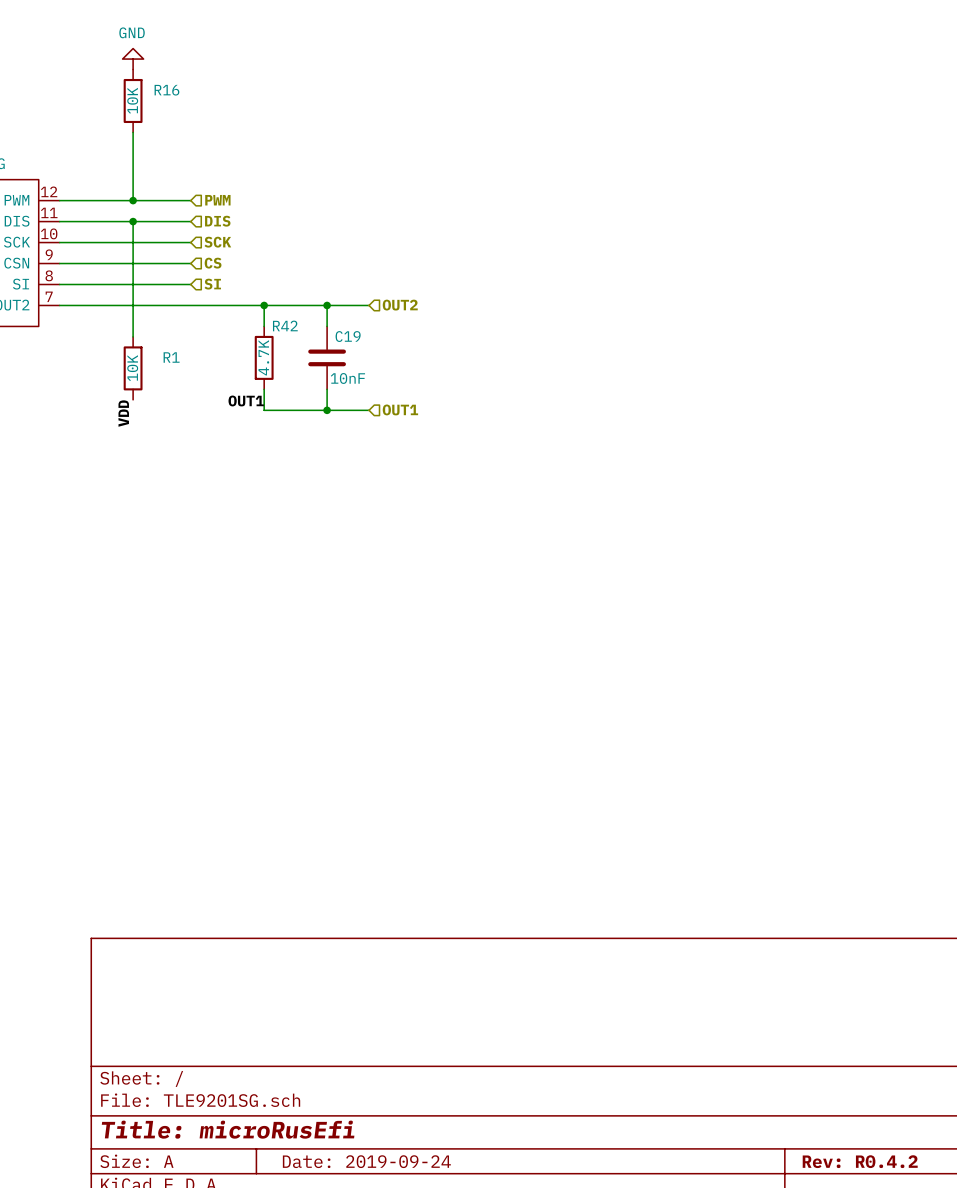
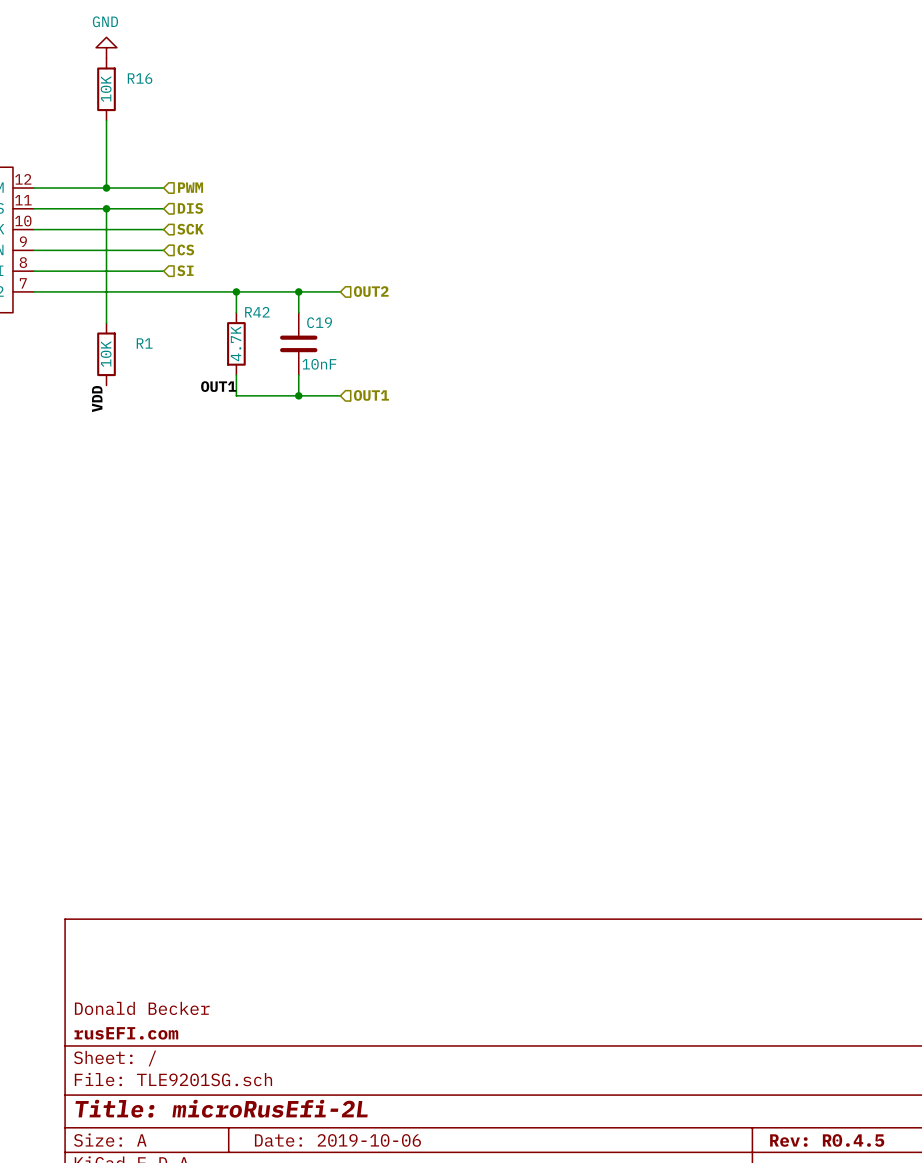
title block: none -> Donald Becker (142, 1008)
title block: none -> rusEFI.com (126, 1033)
title block: Title: microRusEfi (228, 1129) -> Title: microRusEfi-2L (221, 1108)
title block: Date: 2019-09-24 (366, 1161) -> Date: 2019-10-06 (337, 1140)
title block: Rev: R0.4.2 (860, 1161) -> Rev: R0.4.5 (827, 1140)

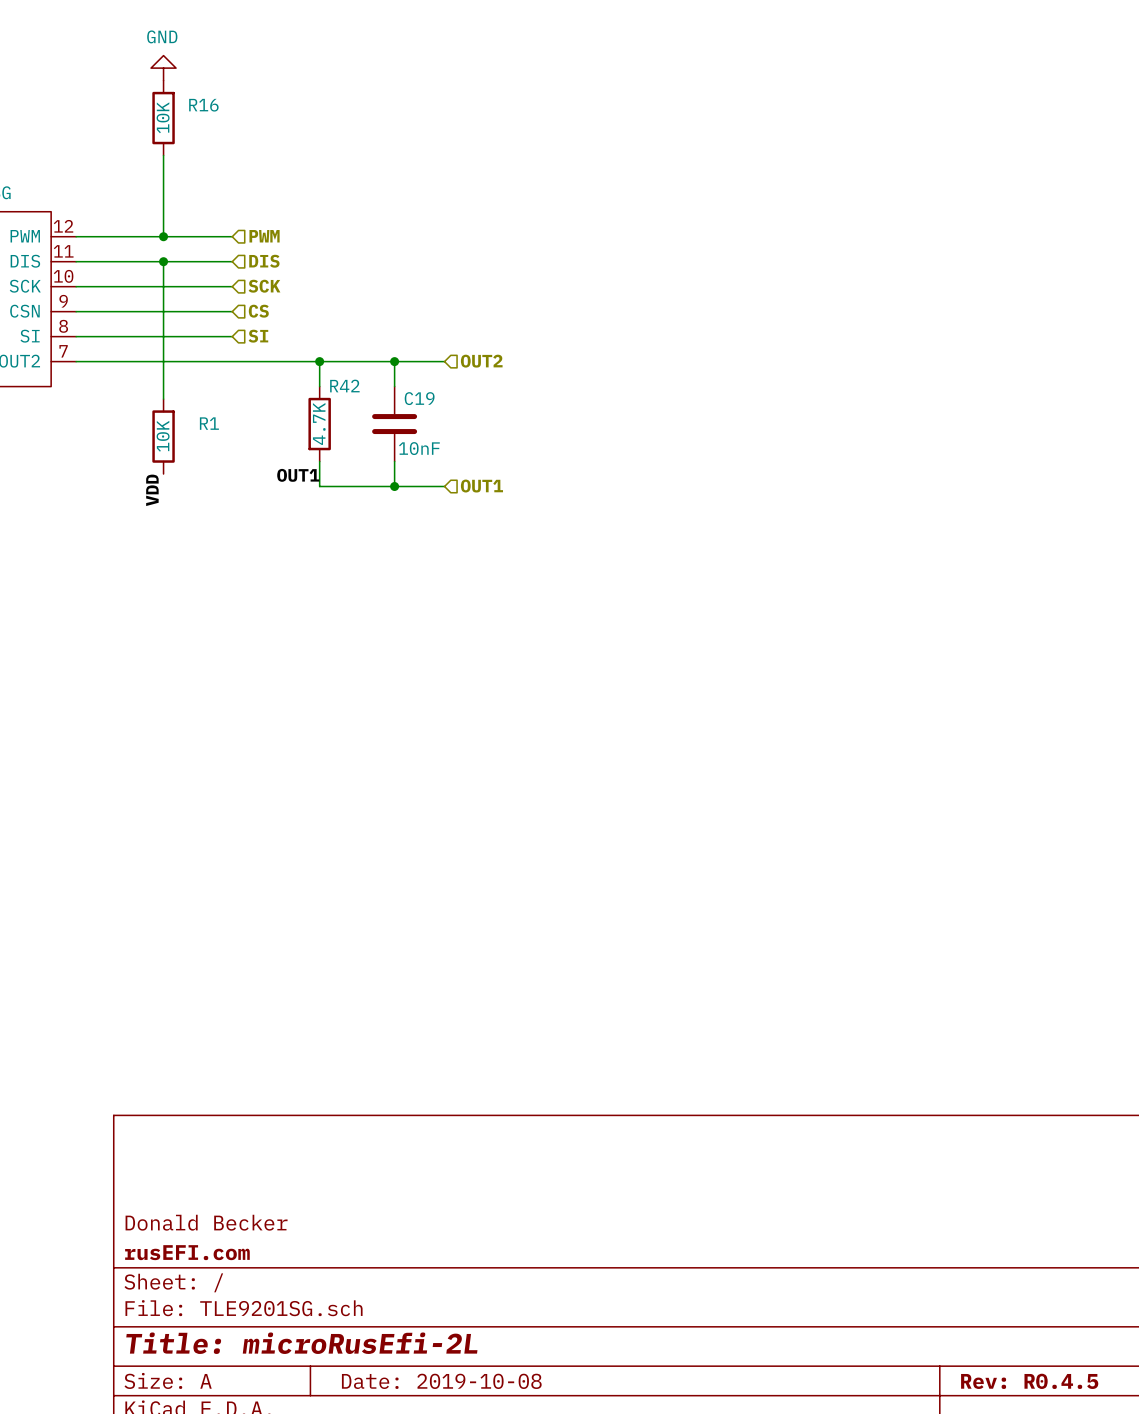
title block: Date: 2019-10-06 (337, 1140) -> Date: 2019-10-08 (441, 1381)

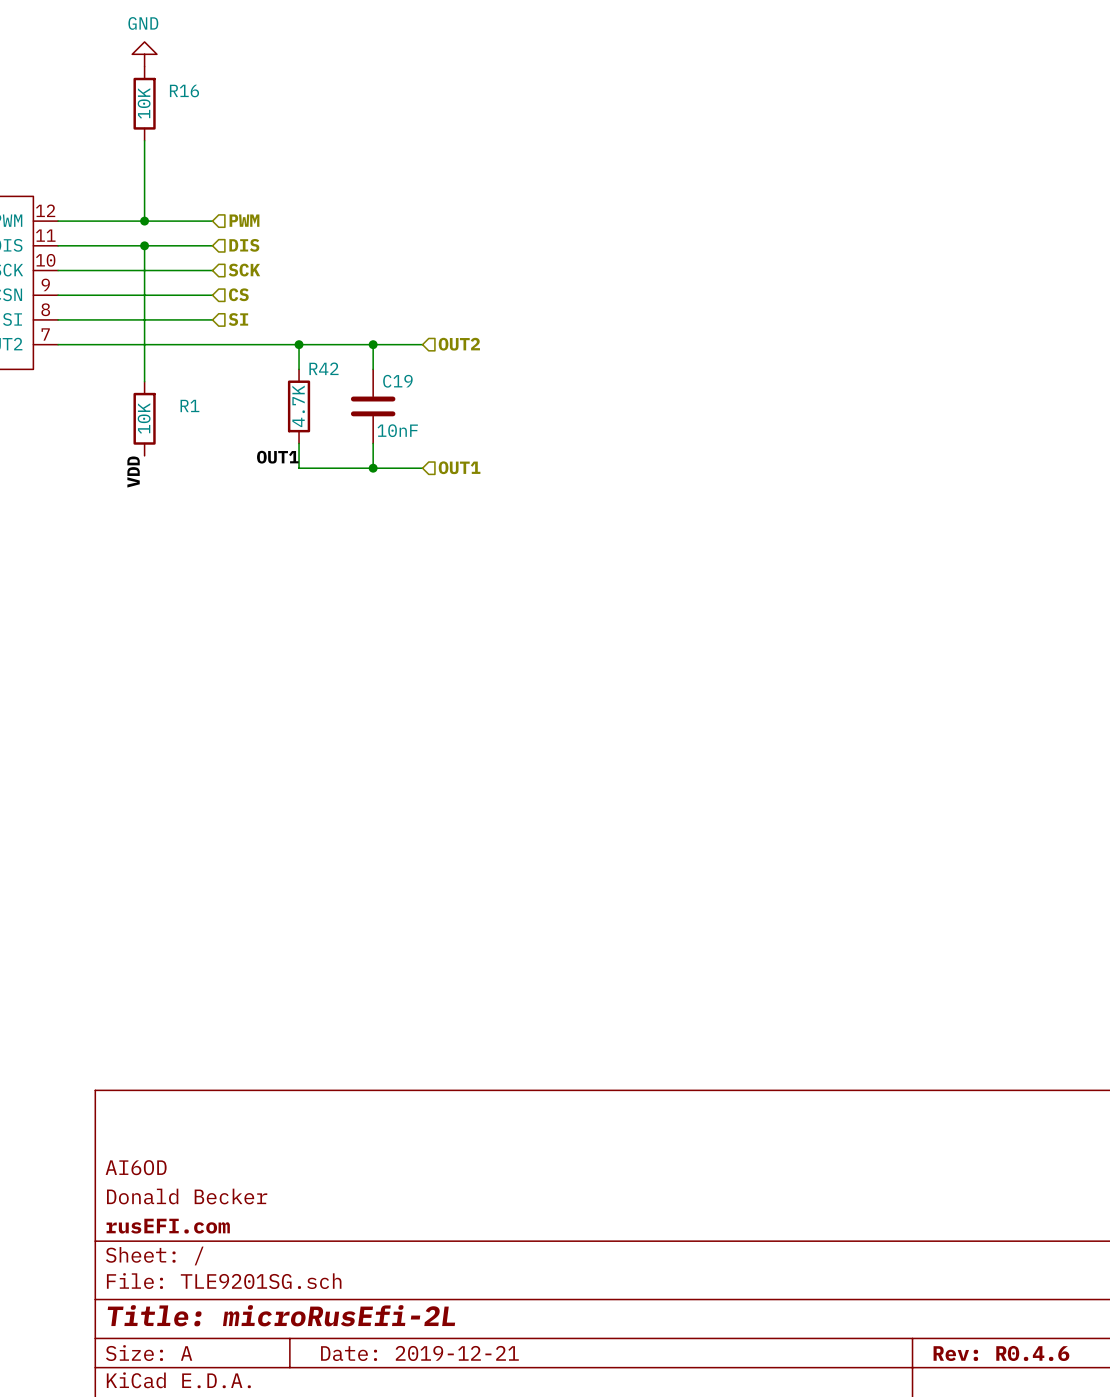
title block: none -> AI6OD (136, 1167)
title block: Date: 2019-10-08 (441, 1381) -> Date: 2019-12-21 (419, 1353)
title block: Rev: R0.4.5 (1029, 1381) -> Rev: R0.4.6 (1001, 1353)

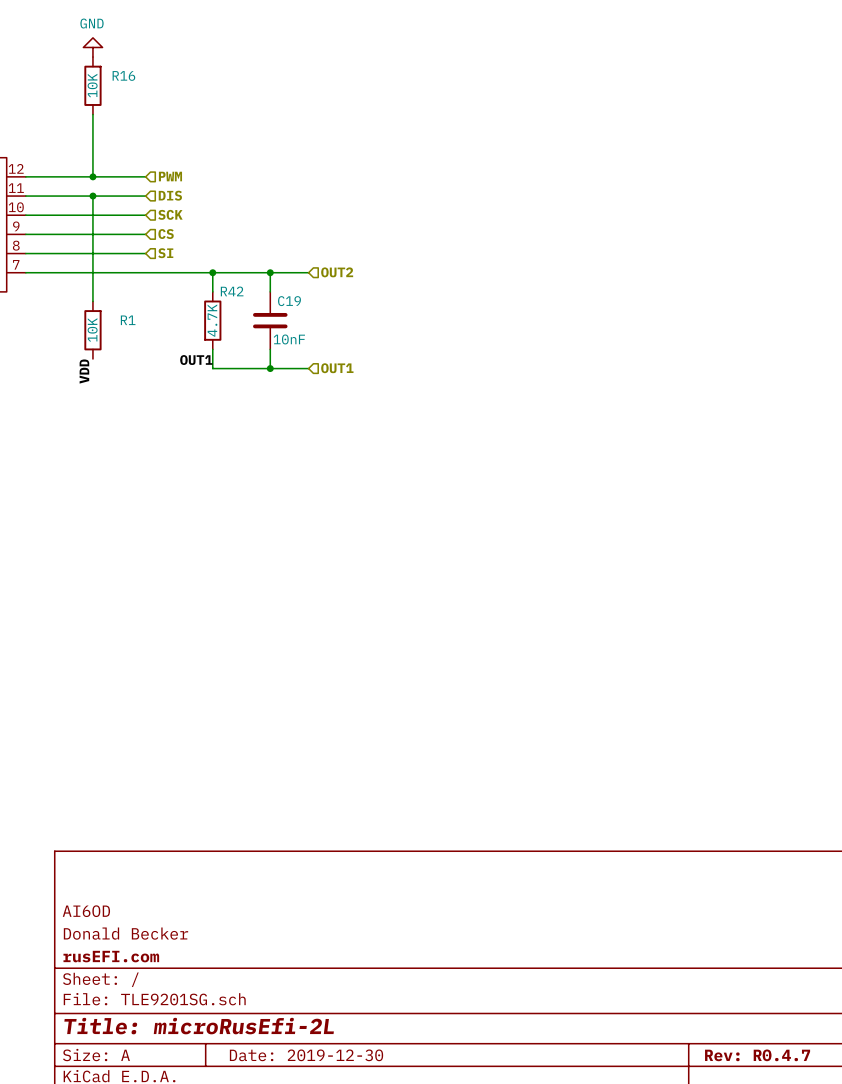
title block: Date: 2019-12-21 (419, 1353) -> Date: 2019-12-30 (306, 1055)
title block: Rev: R0.4.6 (1001, 1353) -> Rev: R0.4.7 (757, 1055)

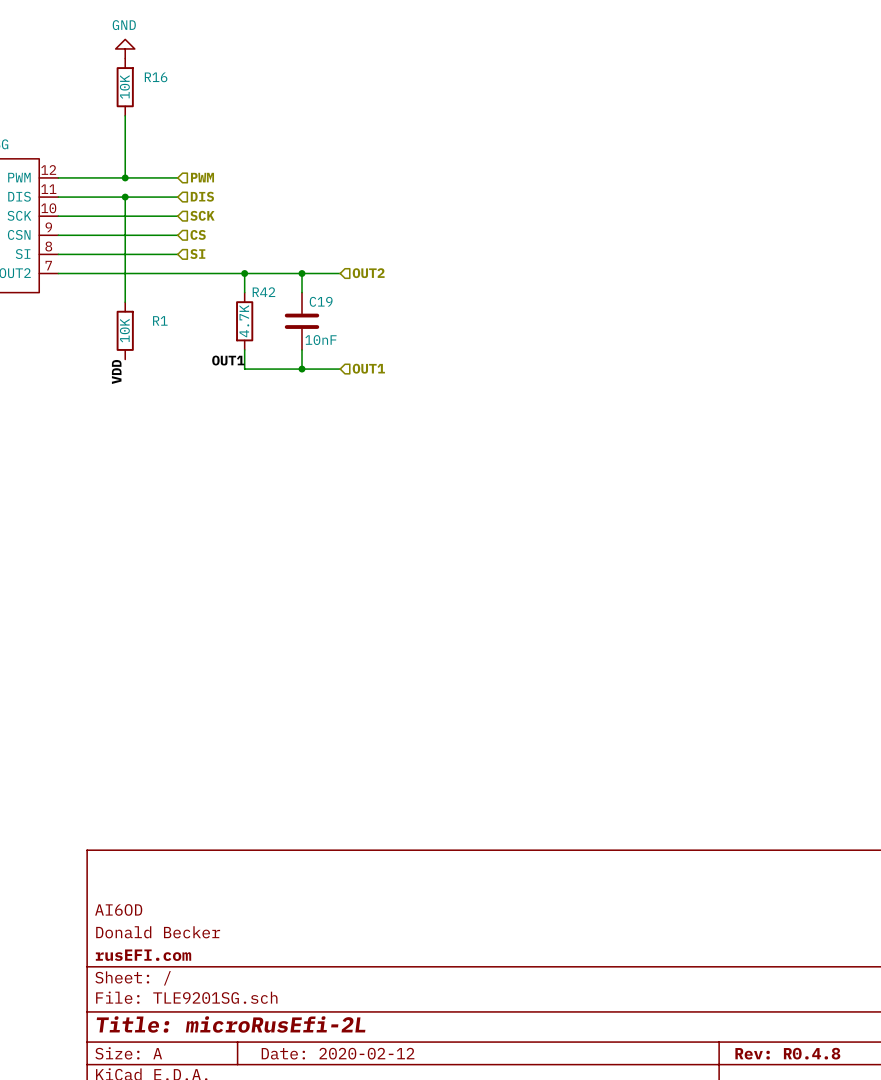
title block: Date: 2019-12-30 (306, 1055) -> Date: 2020-02-12 (338, 1053)
title block: Rev: R0.4.7 (757, 1055) -> Rev: R0.4.8 (787, 1053)

